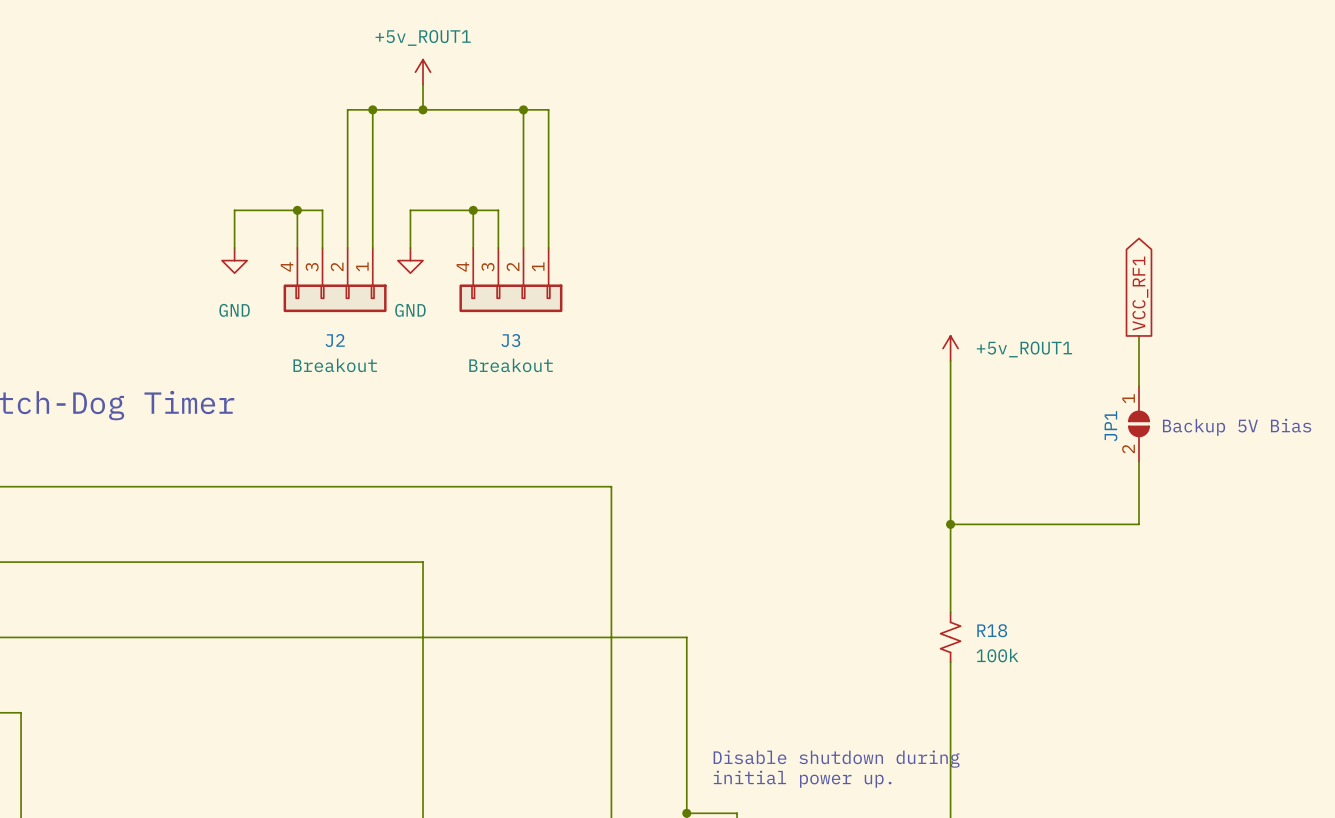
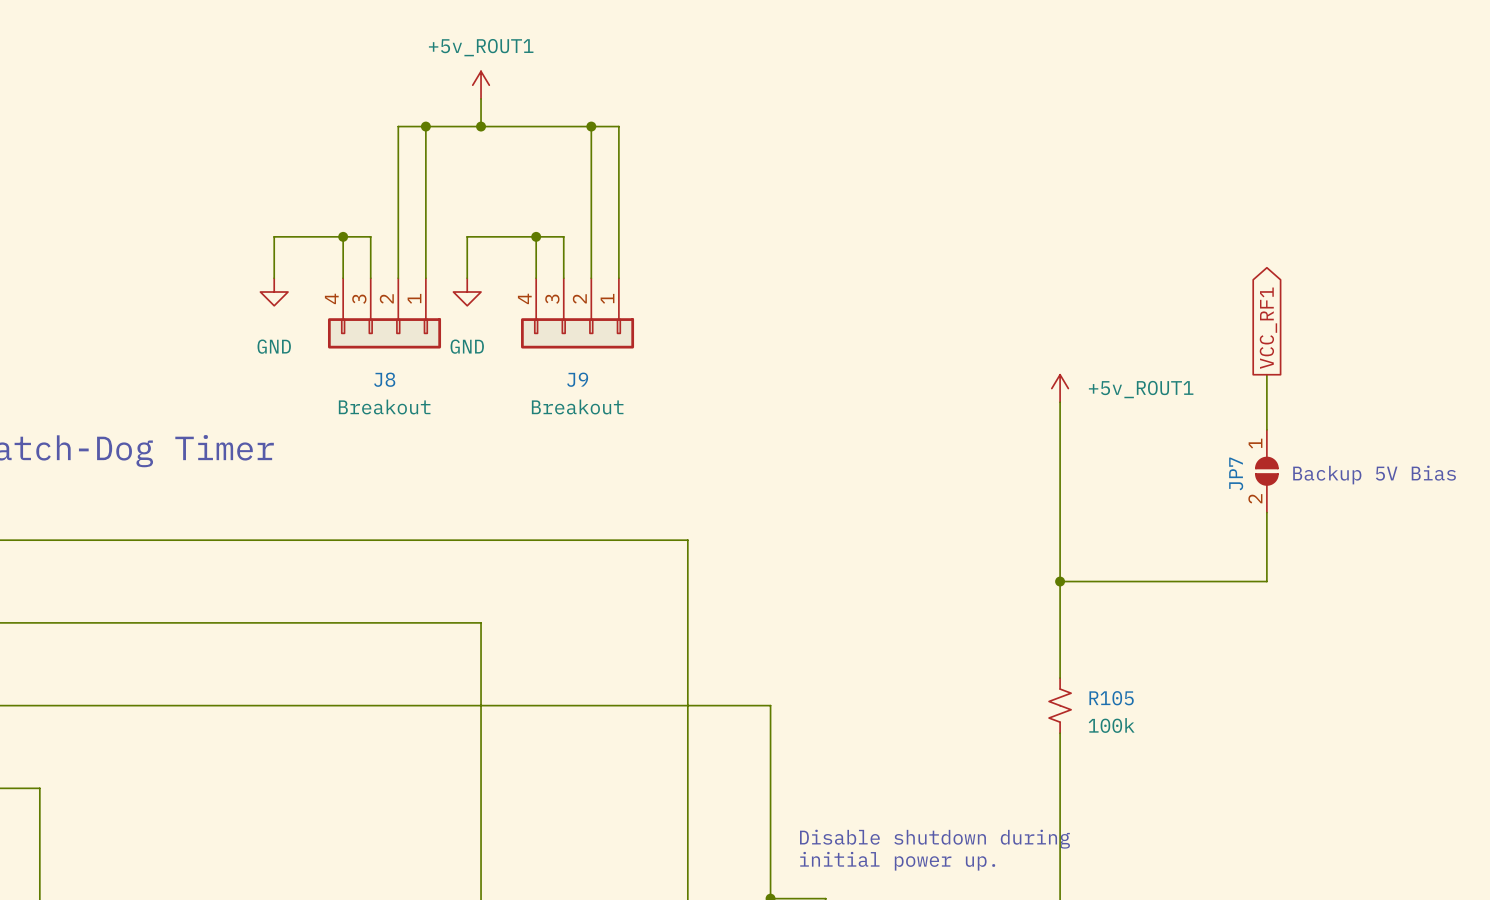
J2 name: J2 (335, 340) -> J8 (384, 379)
J3 name: J3 (510, 340) -> J9 (577, 379)
JP1 name: JP1 (1111, 426) -> JP7 (1236, 473)
R18 name: R18 (992, 630) -> R105 (1111, 698)

